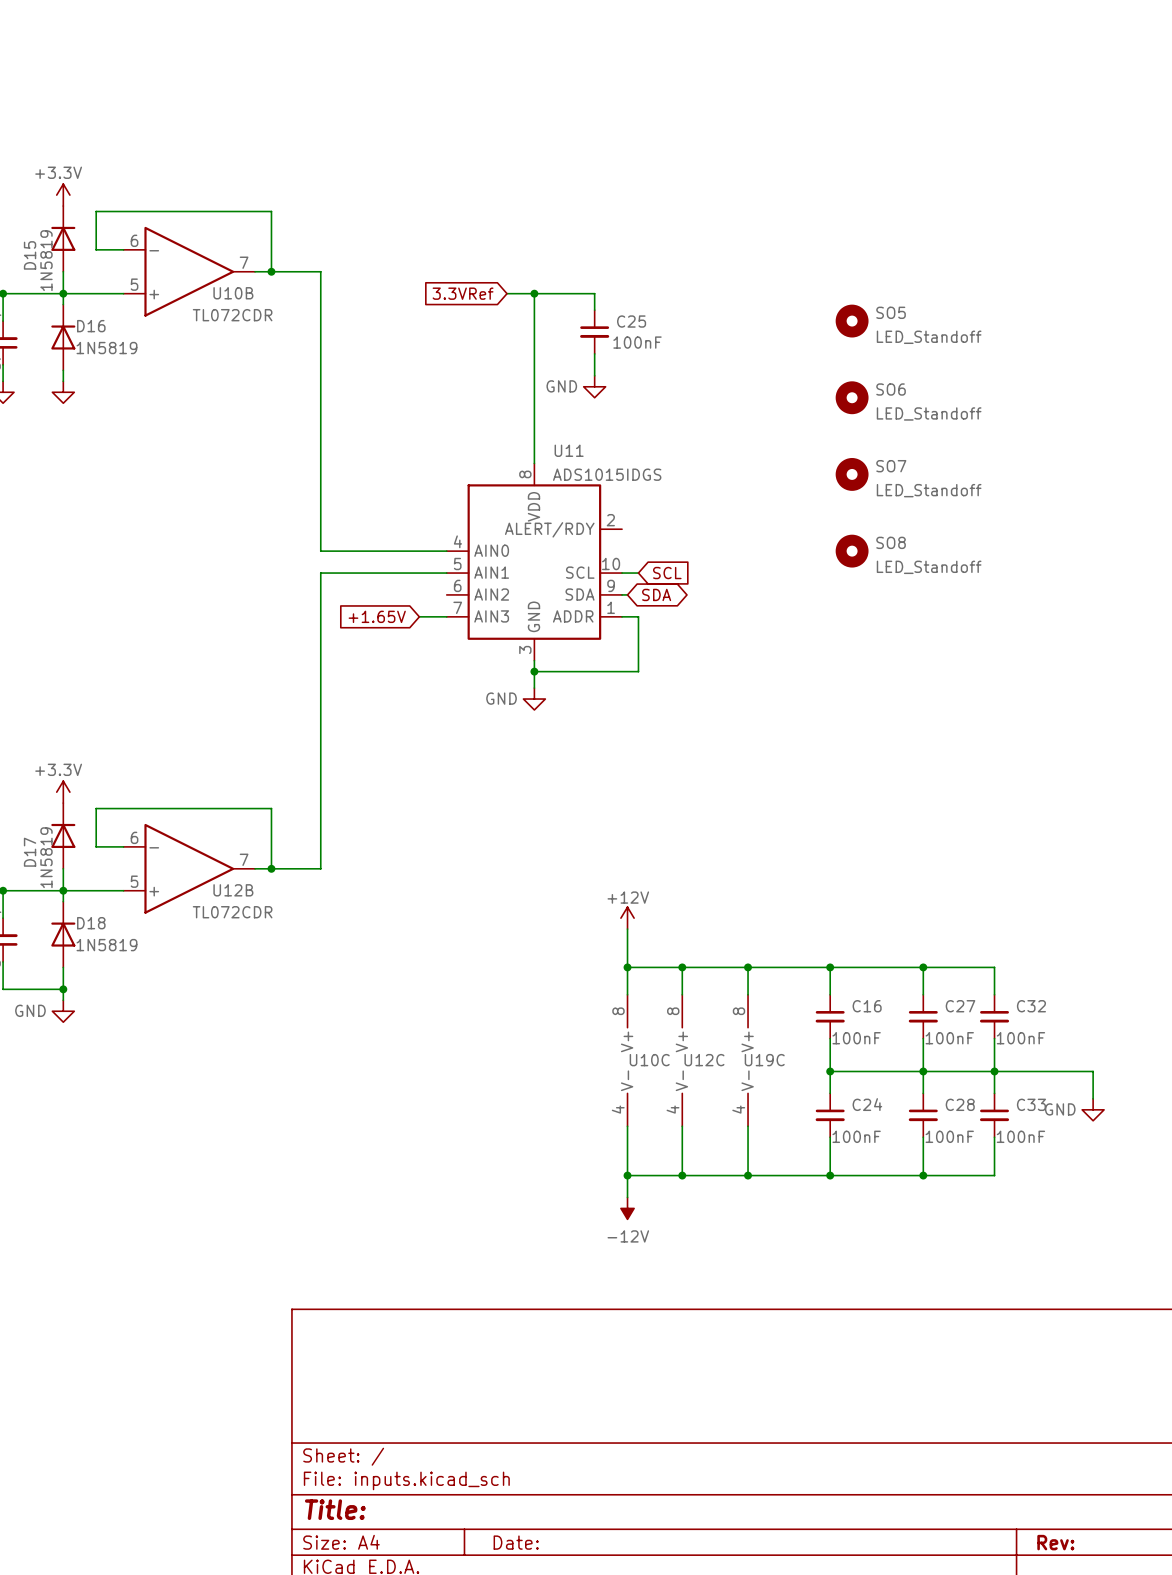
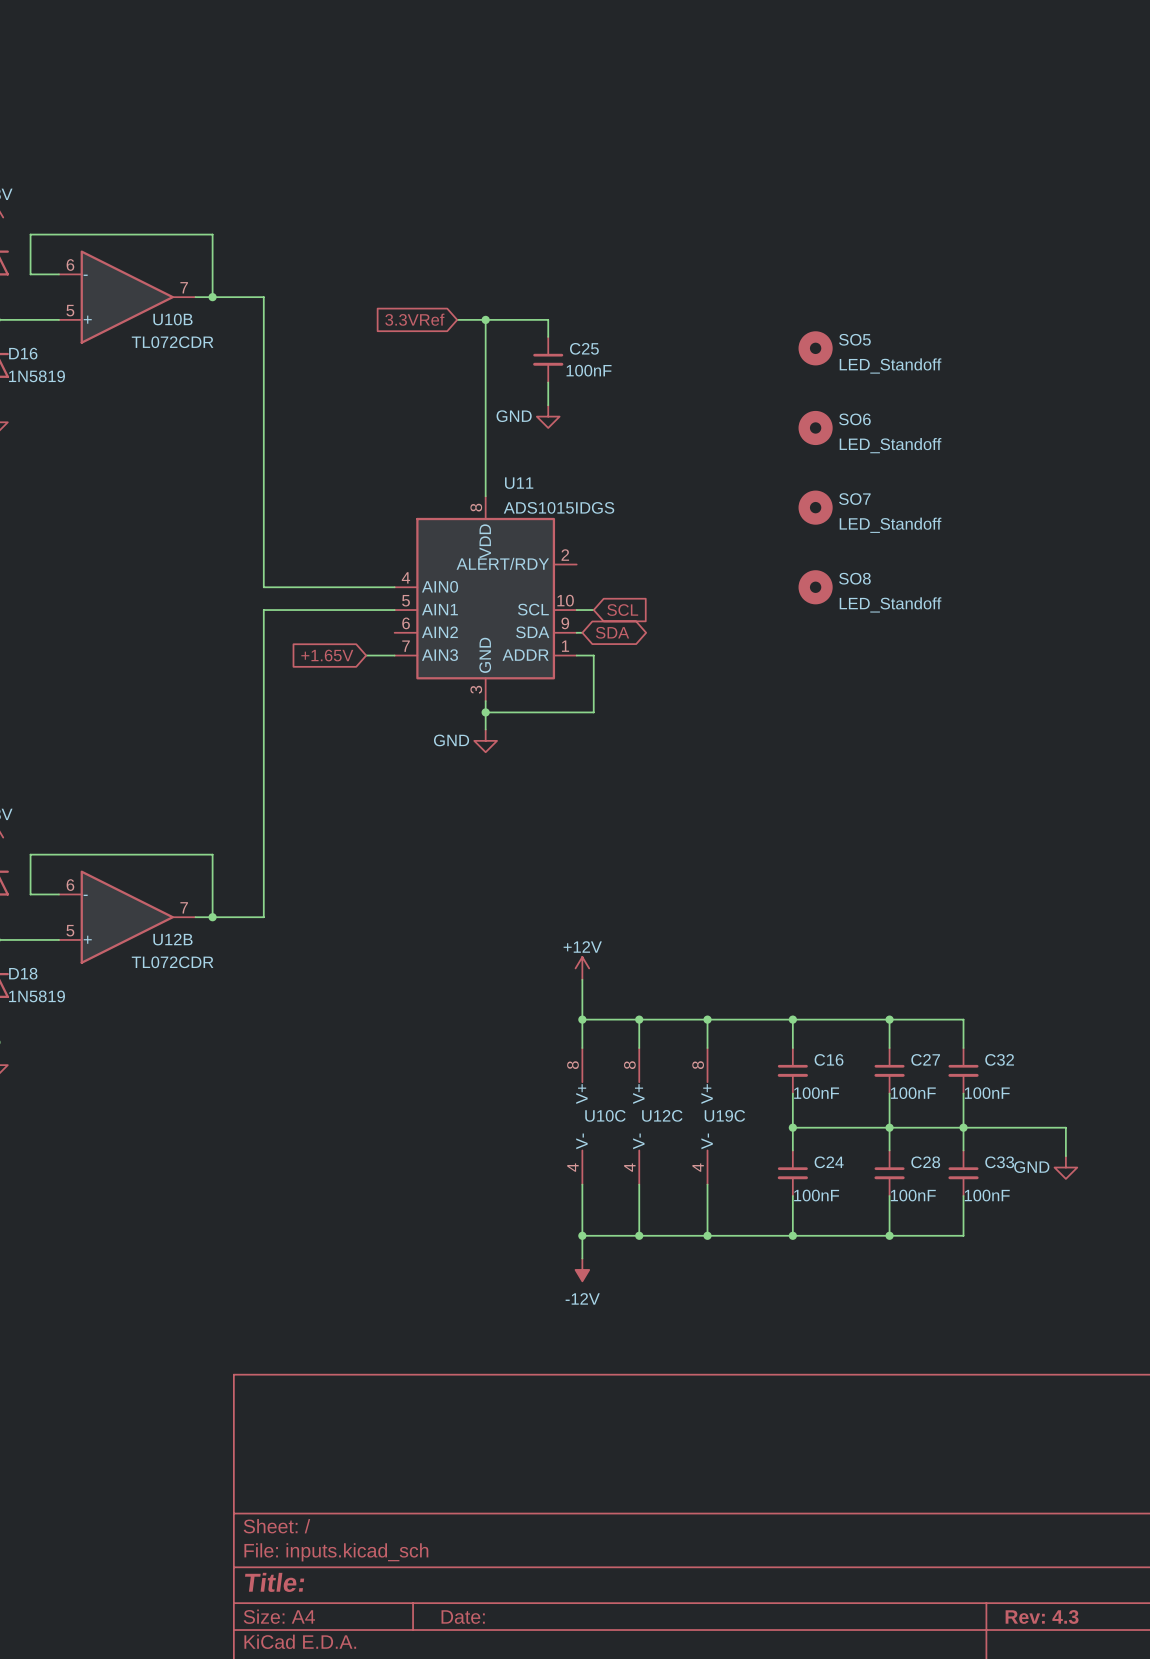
title block: Rev: (1055, 1542) -> Rev: 4.3 (1042, 1616)

